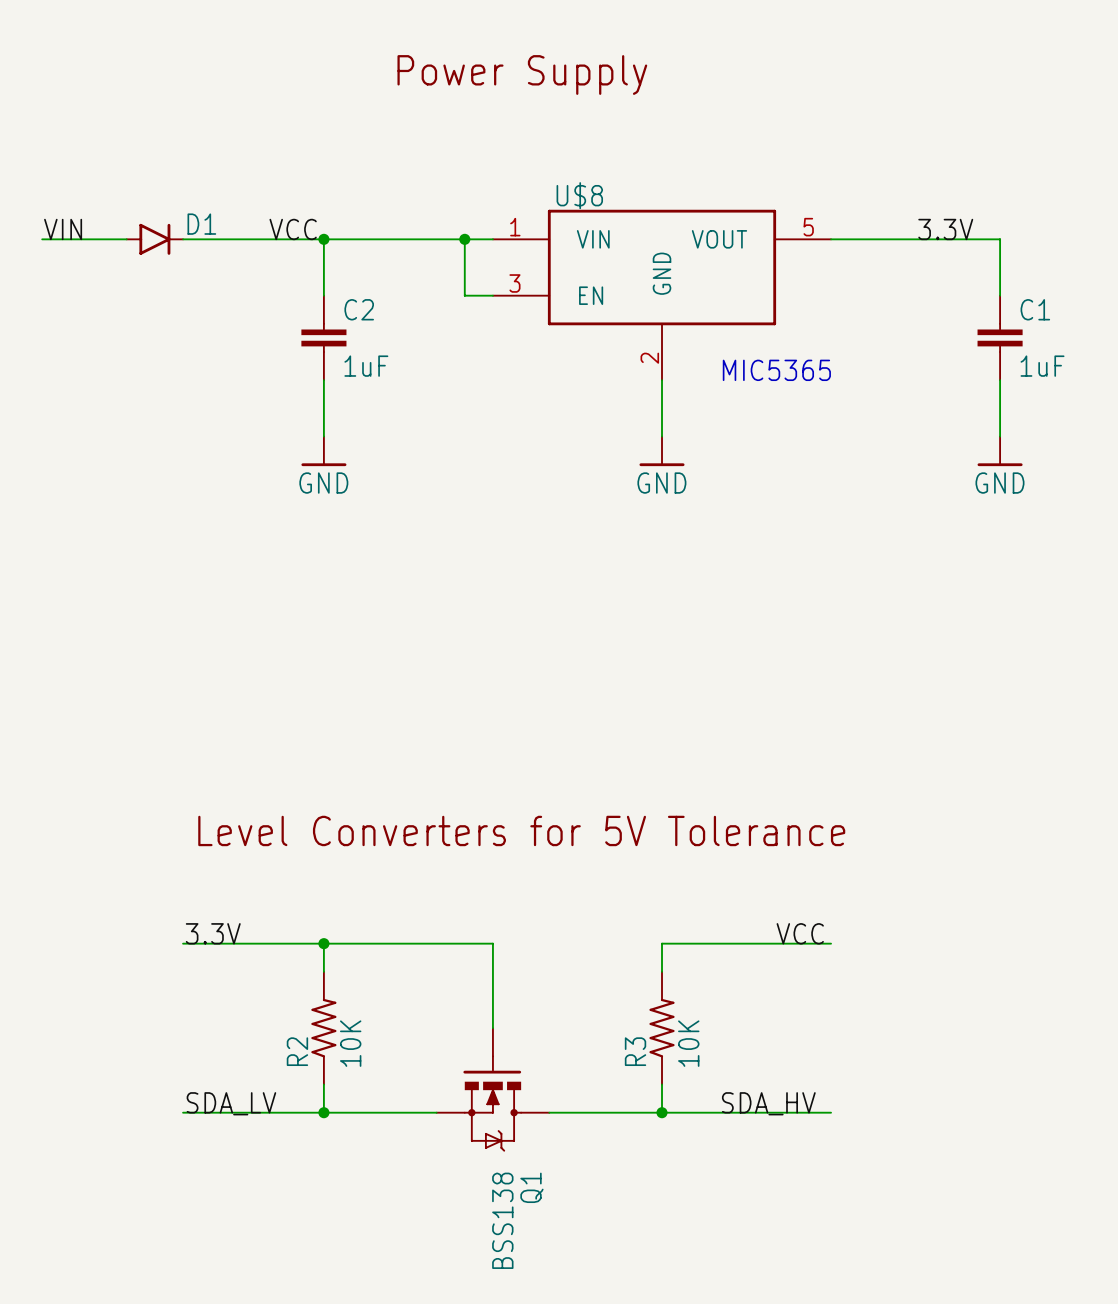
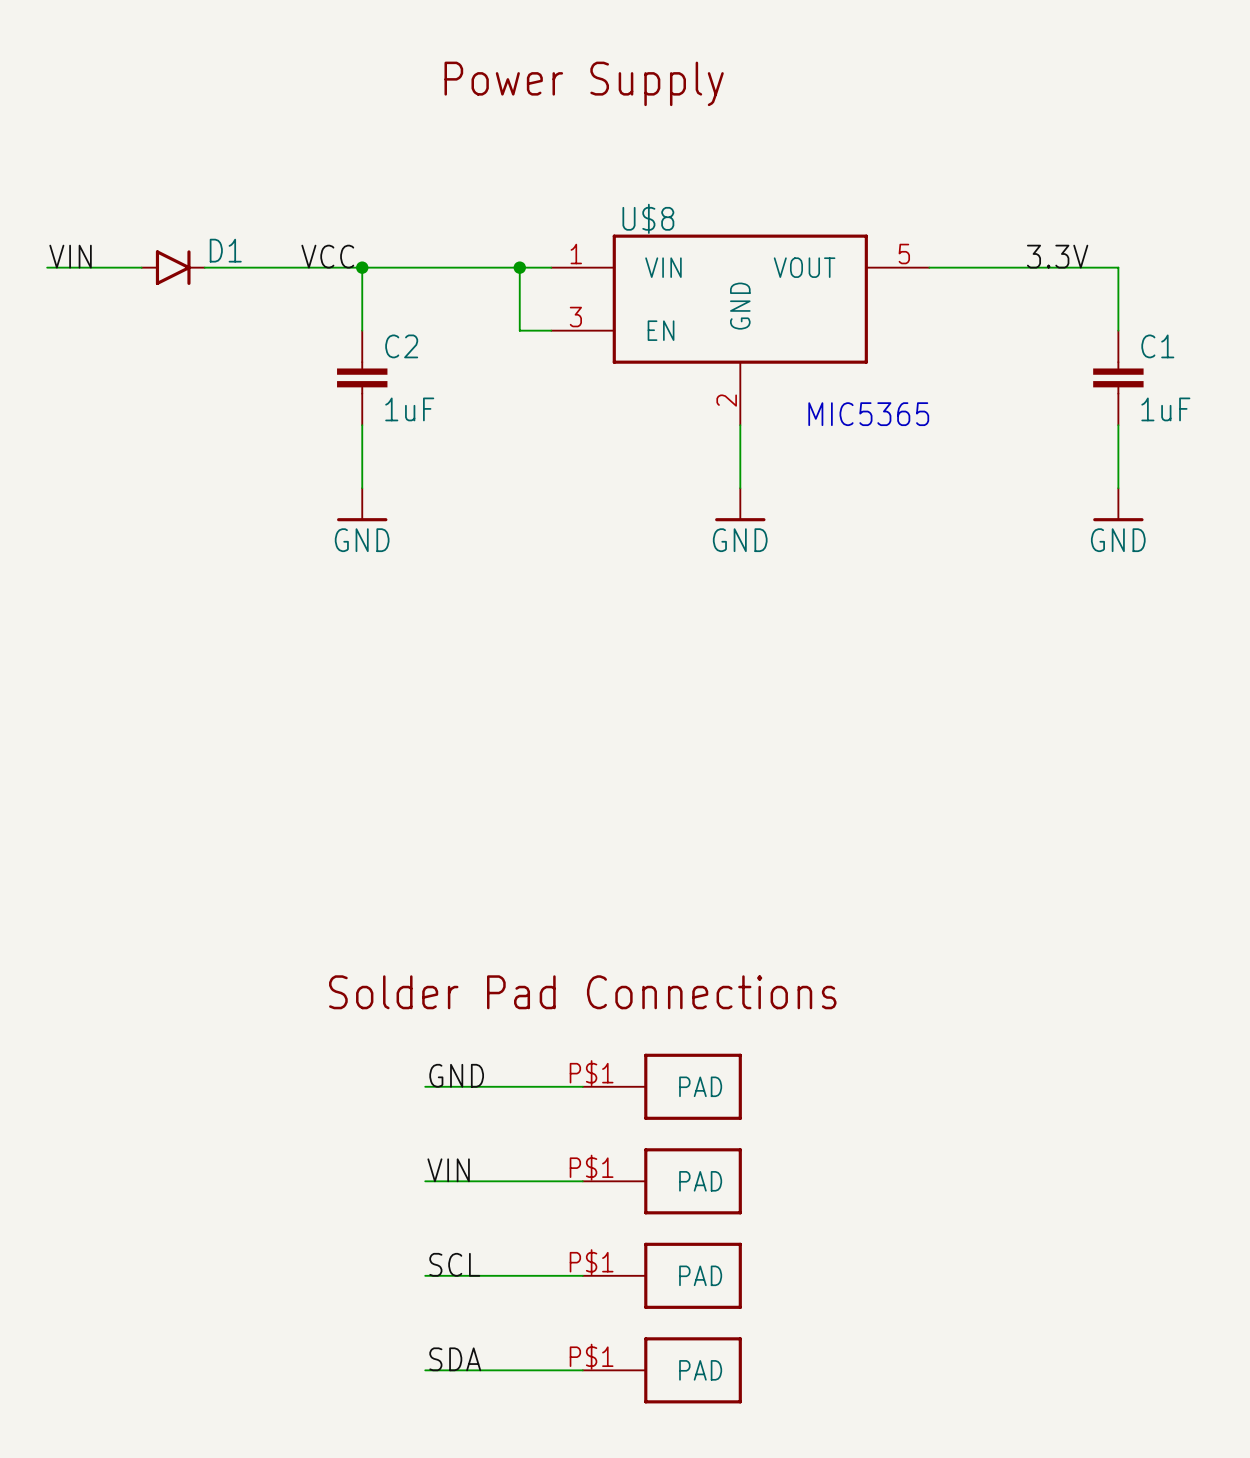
text: Level Converters for 5V Tolerance (521, 830) -> none
text: none -> Solder Pad Connections (582, 992)
label: 3.3V (213, 933) -> none
label: VCC (800, 933) -> none
wire: (183, 943) (492, 943) (492, 1028) -> none
wire: (323, 943) (323, 971) -> none
junction: (323, 943) -> none
wire: (831, 943) (662, 943) (662, 971) -> none
label: none -> GND (456, 1075)
wire: none -> (425, 1086) (582, 1086)
part: none -> (662, 1086)
R2: 10K (323, 1028) -> none
R3: 10K (662, 1028) -> none
label: none -> VIN (448, 1170)
wire: none -> (425, 1181) (582, 1181)
part: none -> (662, 1181)
wire: (323, 1084) (323, 1112) -> none
wire: (662, 1084) (662, 1112) -> none
Q1: BSS138 (492, 1089) -> none
label: SDA_LV (231, 1103) -> none
label: SDA_HV (768, 1103) -> none
wire: (183, 1112) (436, 1112) -> none
junction: (323, 1112) -> none
wire: (549, 1112) (831, 1112) -> none
junction: (662, 1112) -> none
label: none -> SCL (454, 1264)
wire: none -> (425, 1275) (582, 1275)
part: none -> (662, 1275)
label: none -> SDA (455, 1359)
wire: none -> (425, 1370) (582, 1370)
part: none -> (662, 1370)

